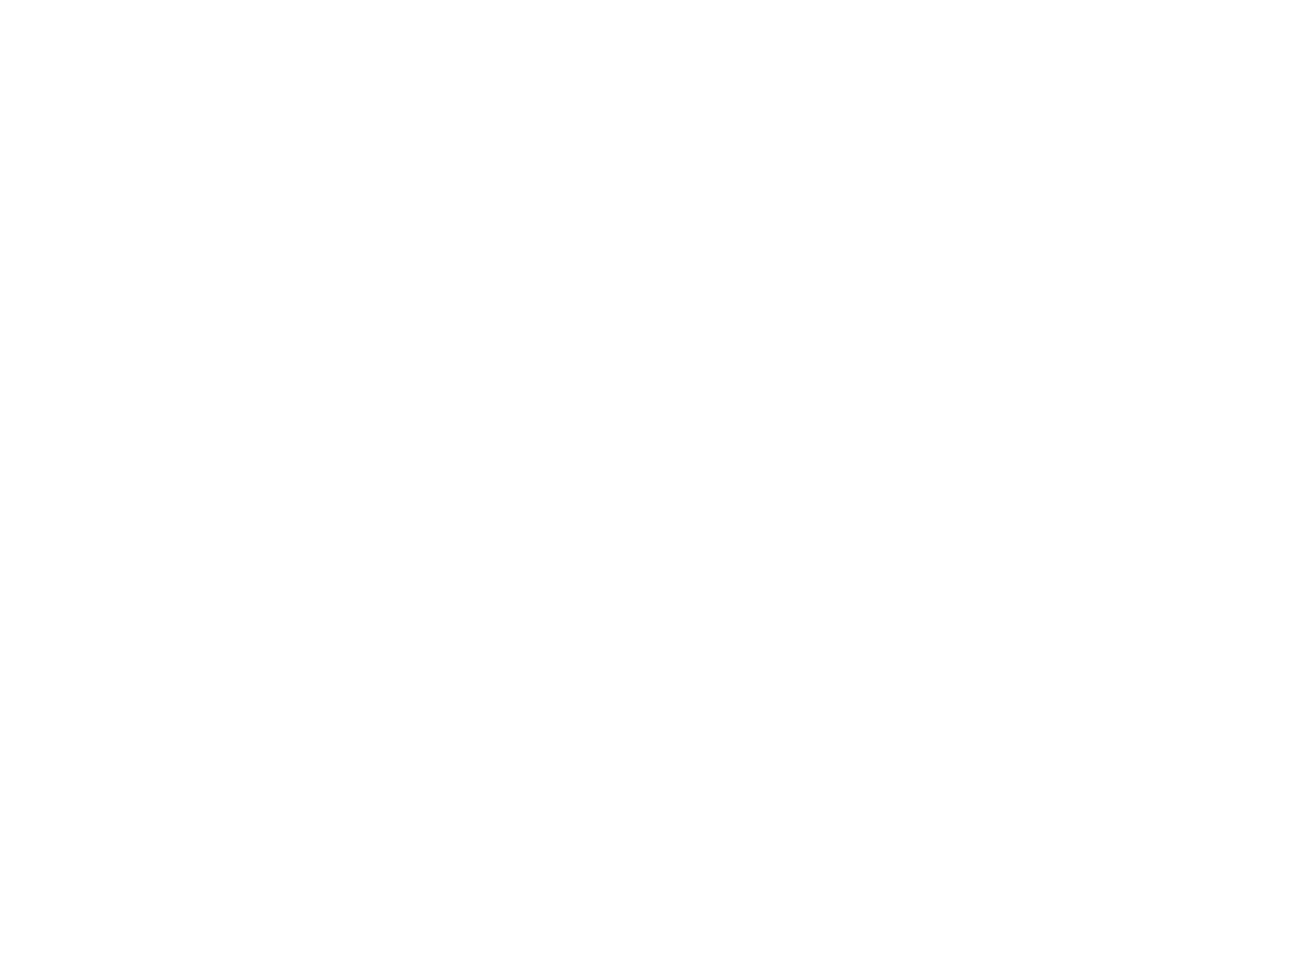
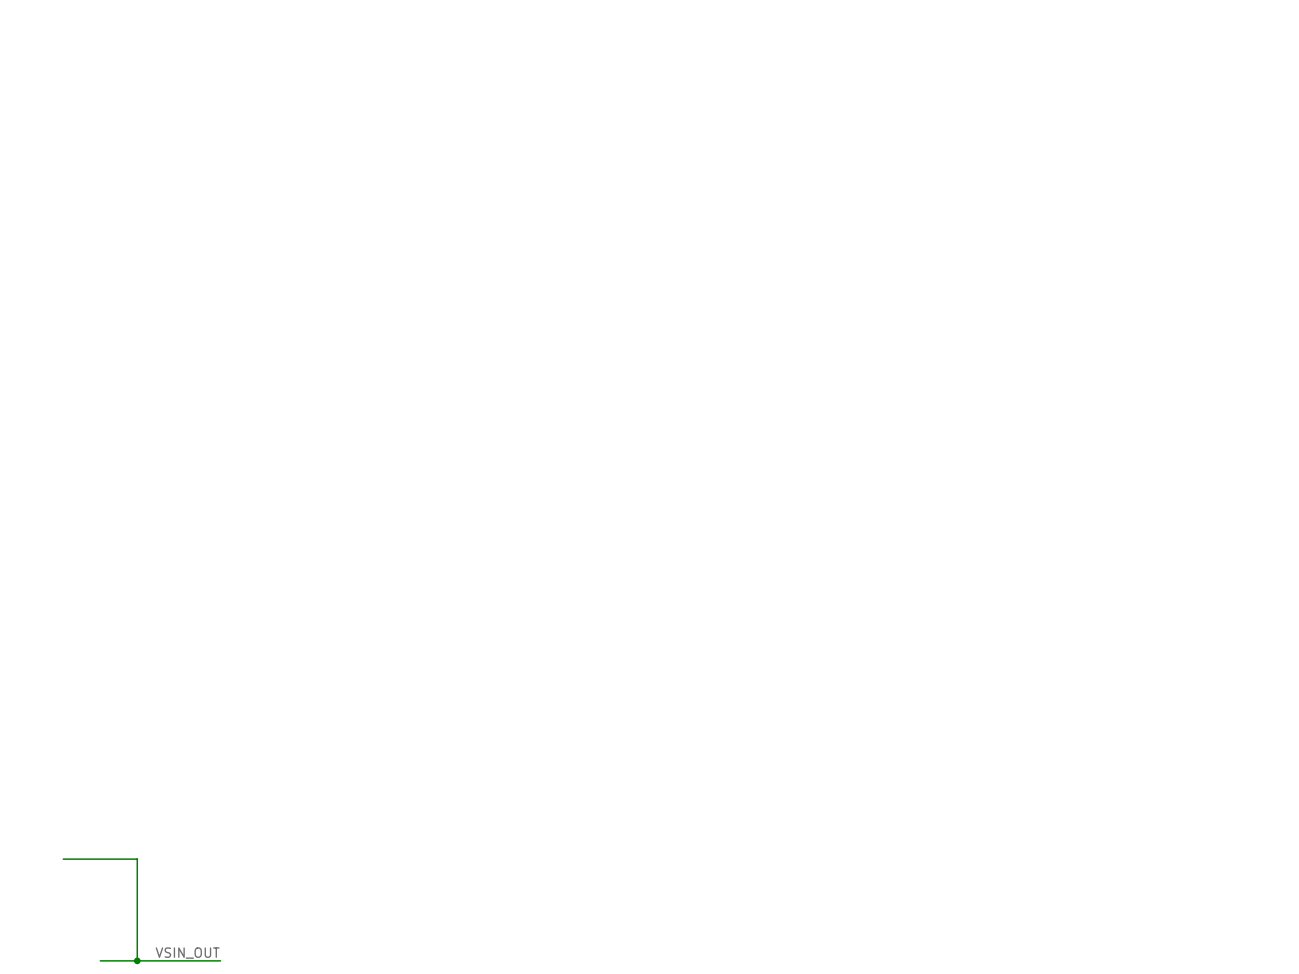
wire: none -> (63, 859) (137, 859) (137, 960)
label: none -> VSIN_OUT (187, 953)
wire: none -> (100, 960) (220, 960)
junction: none -> (137, 960)

